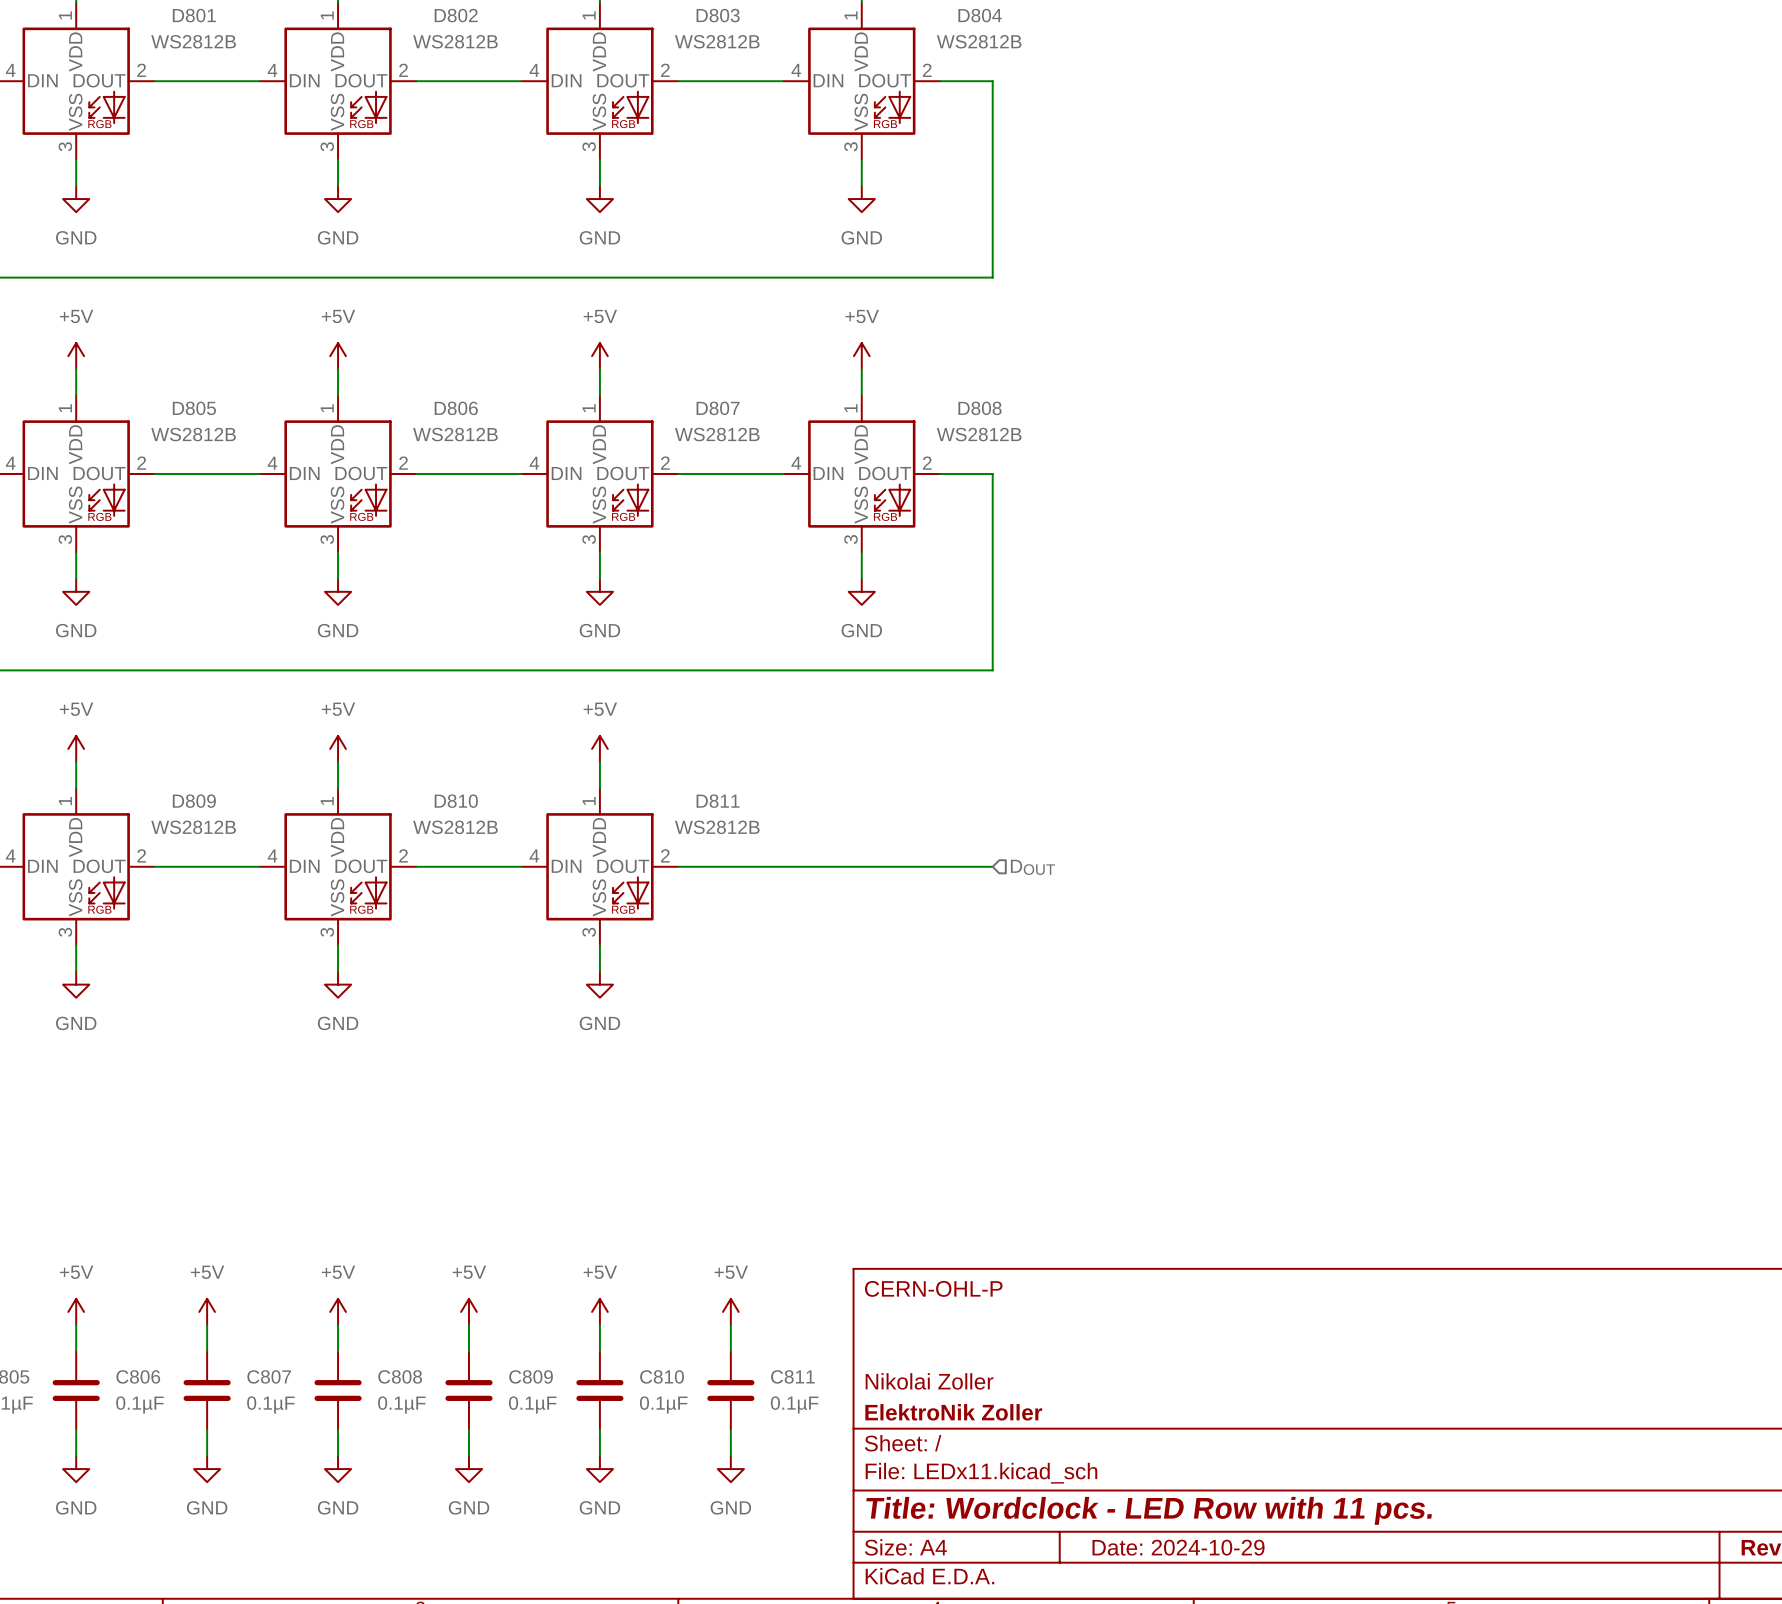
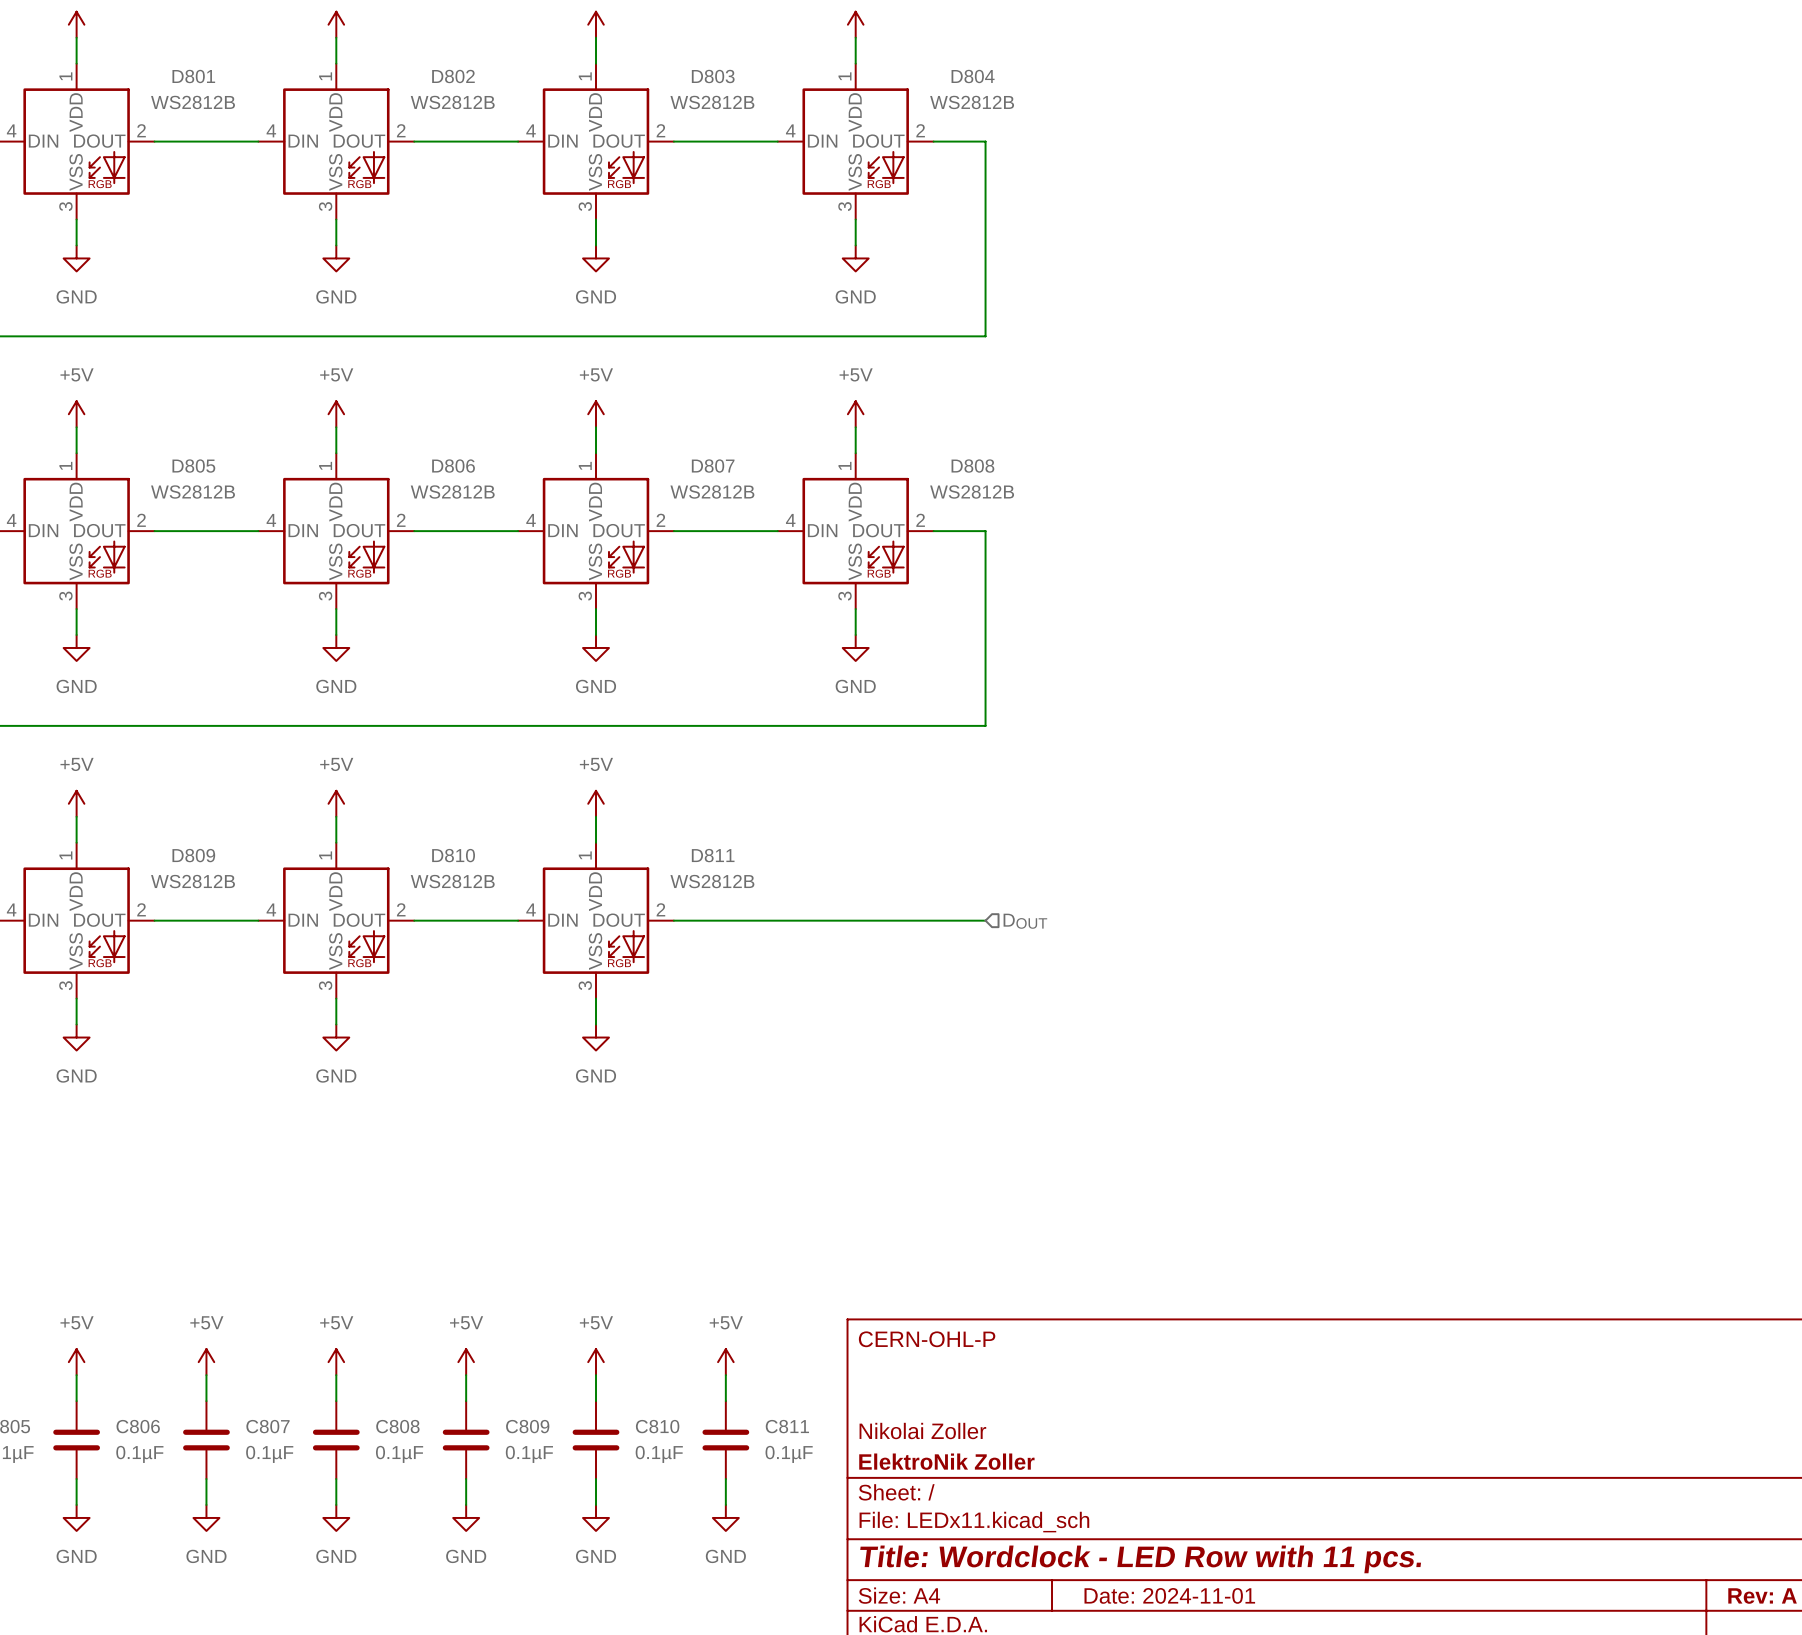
title block: Date: 2024-10-29 (1178, 1547) -> Date: 2024-11-01 (1169, 1595)

